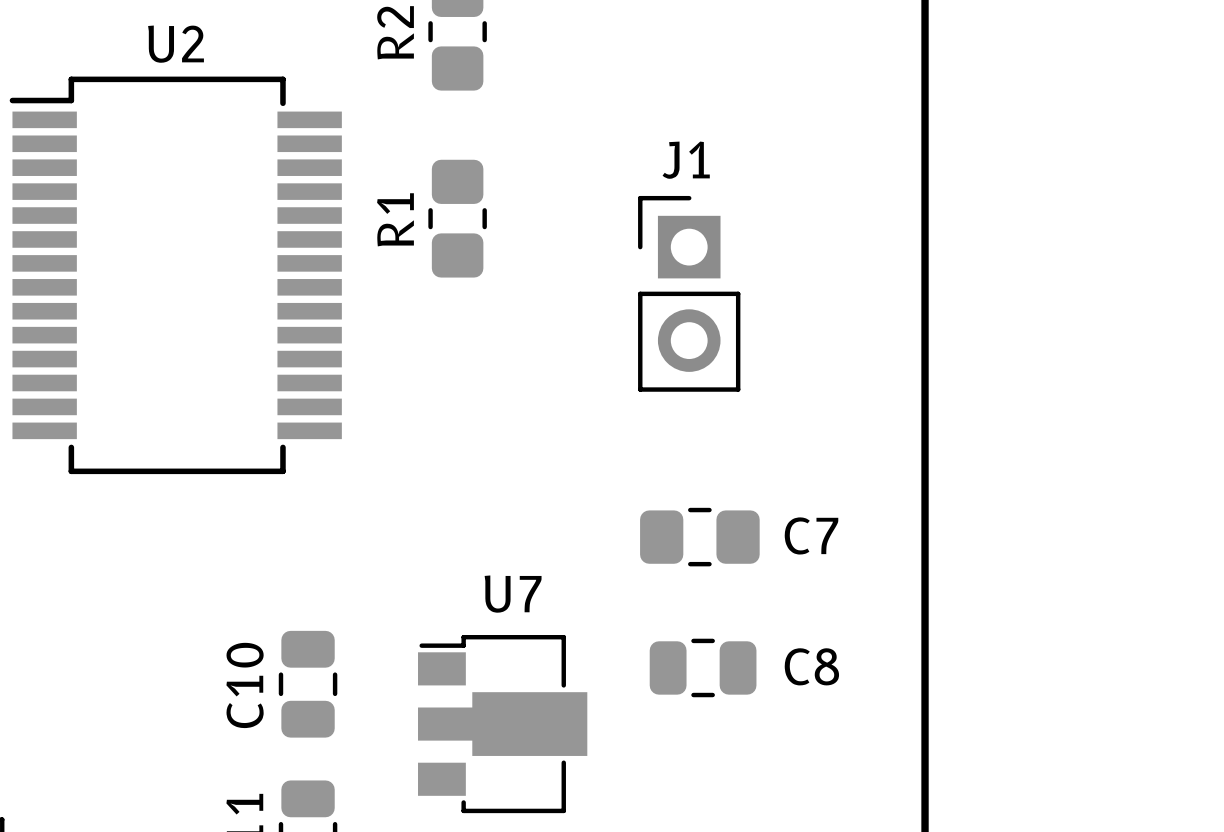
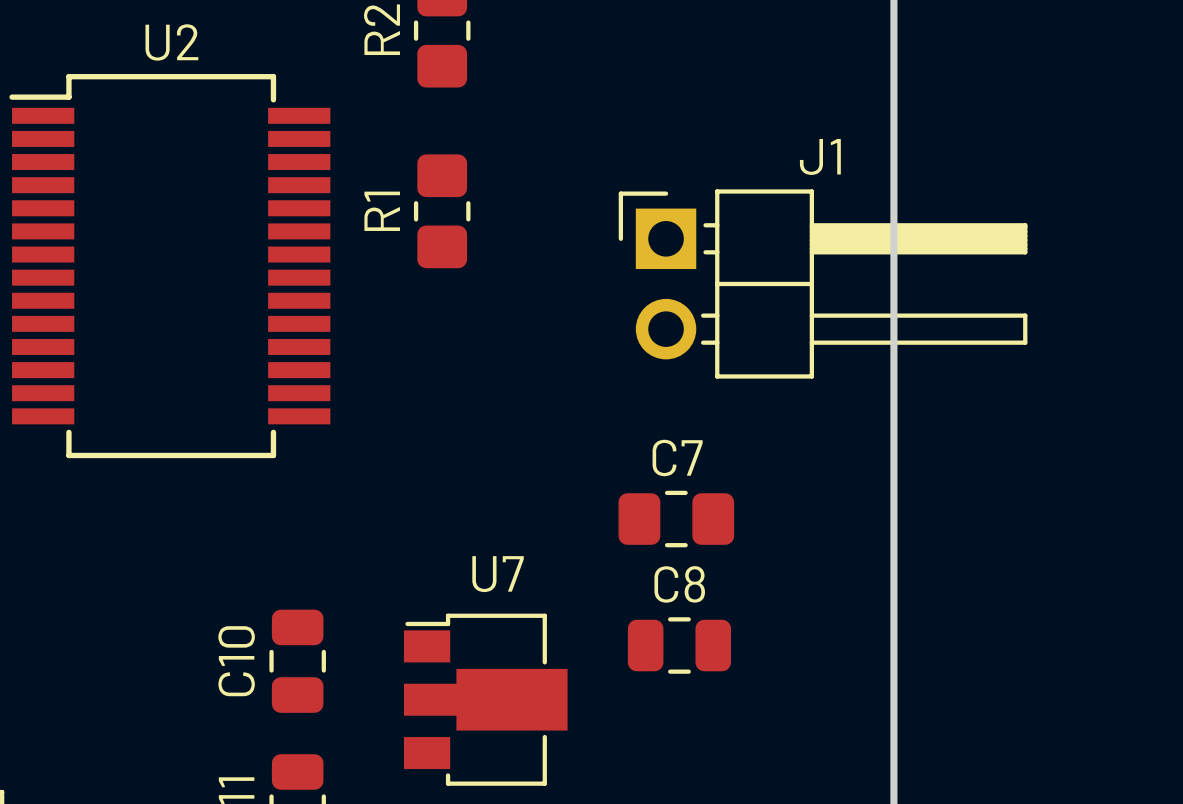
J1 footprint: [638, 195, 741, 392] -> [618, 189, 1028, 379]
C7 name position: C7 (811, 535) -> C7 (677, 457)
C8 name position: C8 (811, 666) -> C8 (679, 584)

